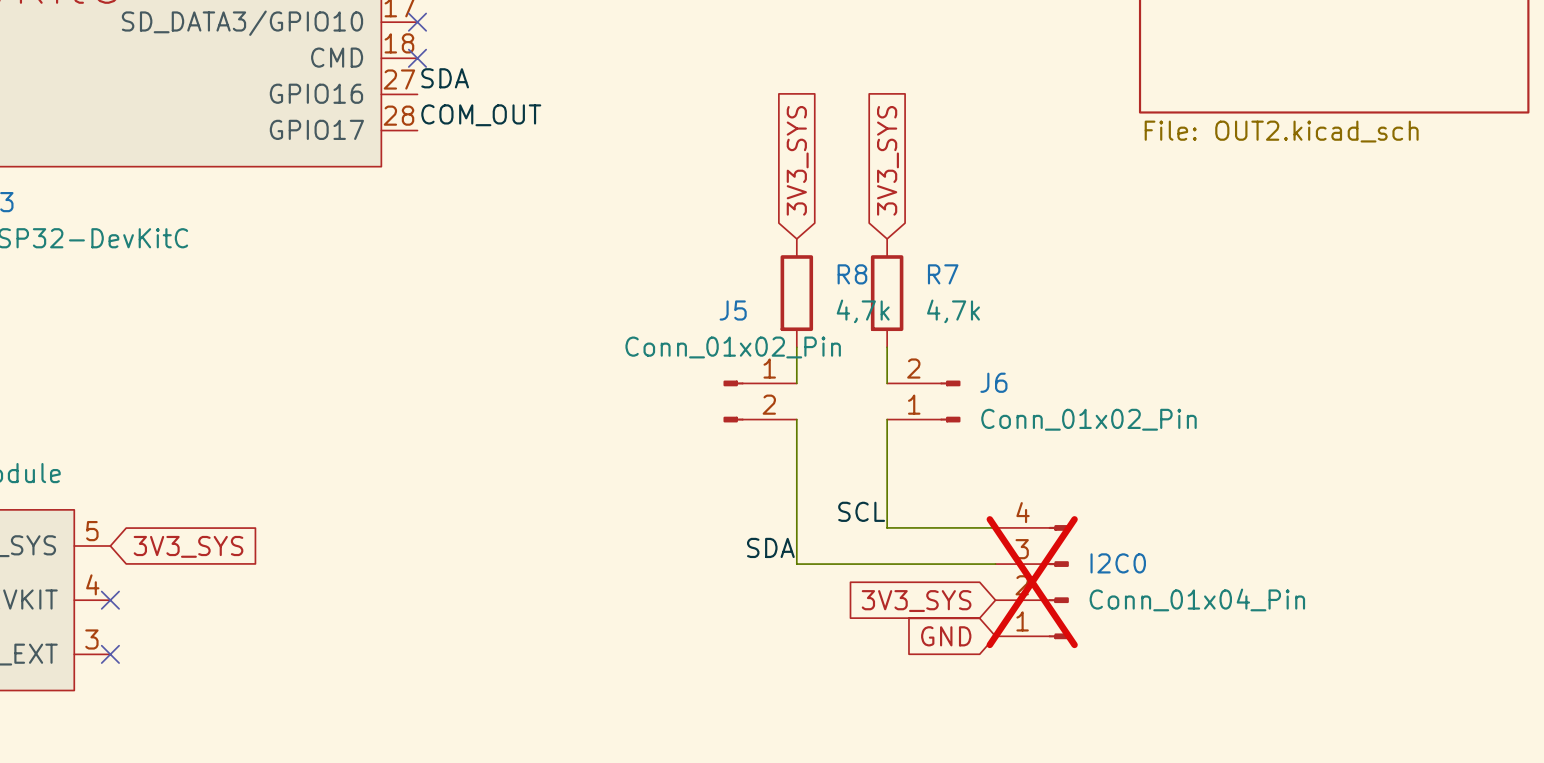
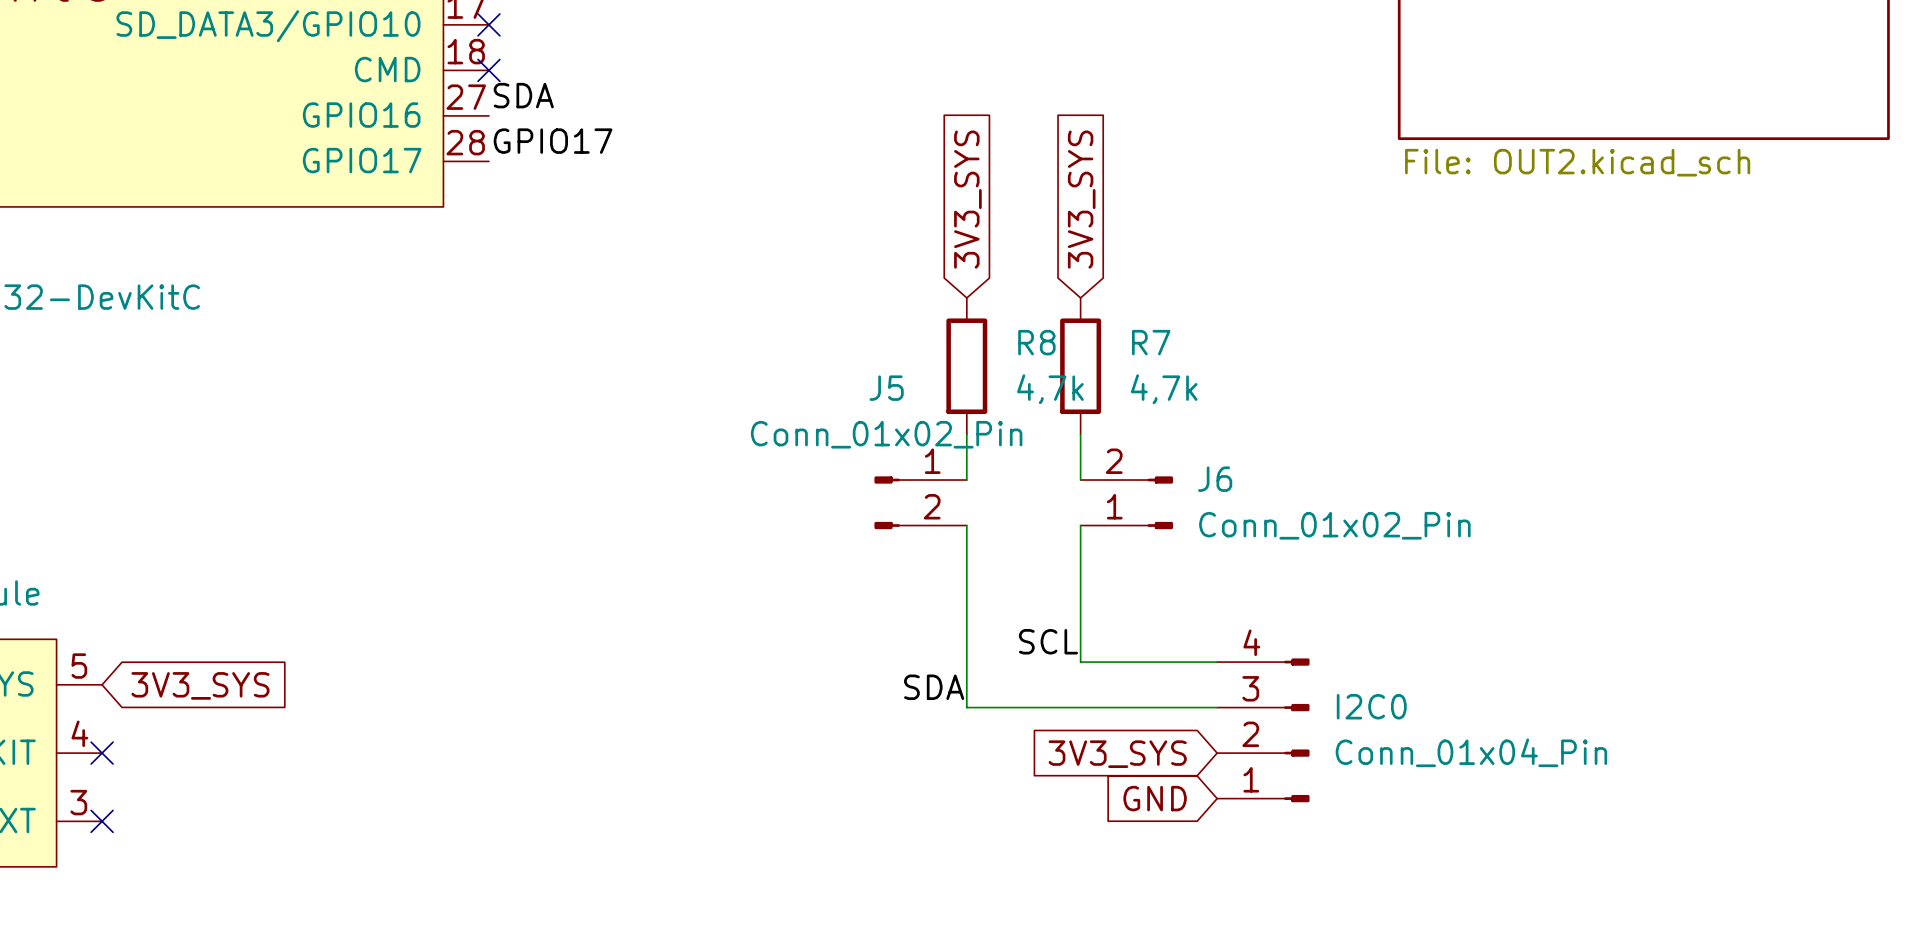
label: COM_OUT (481, 115) -> GPIO17 (553, 141)
I2C0 do-not-place cross: (1032, 582) -> none

